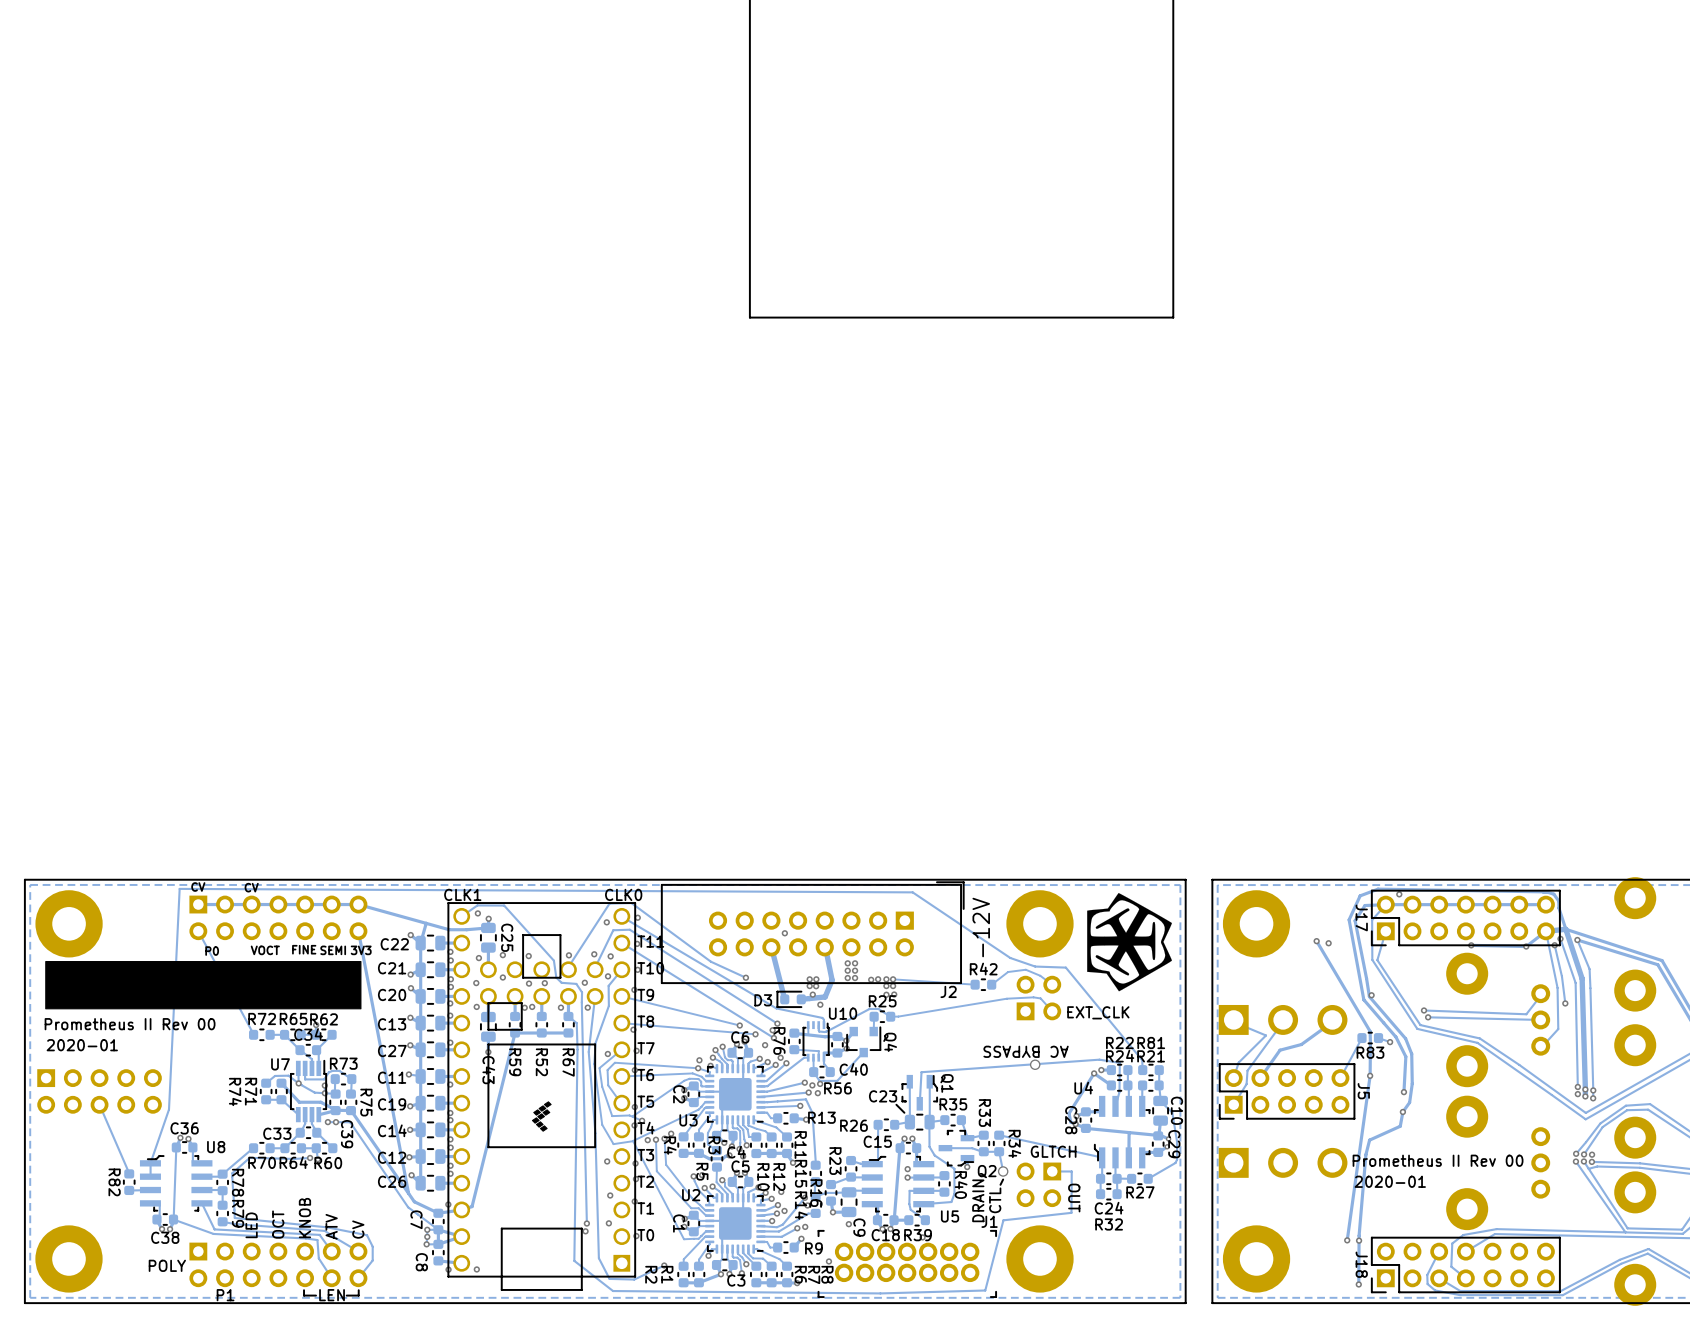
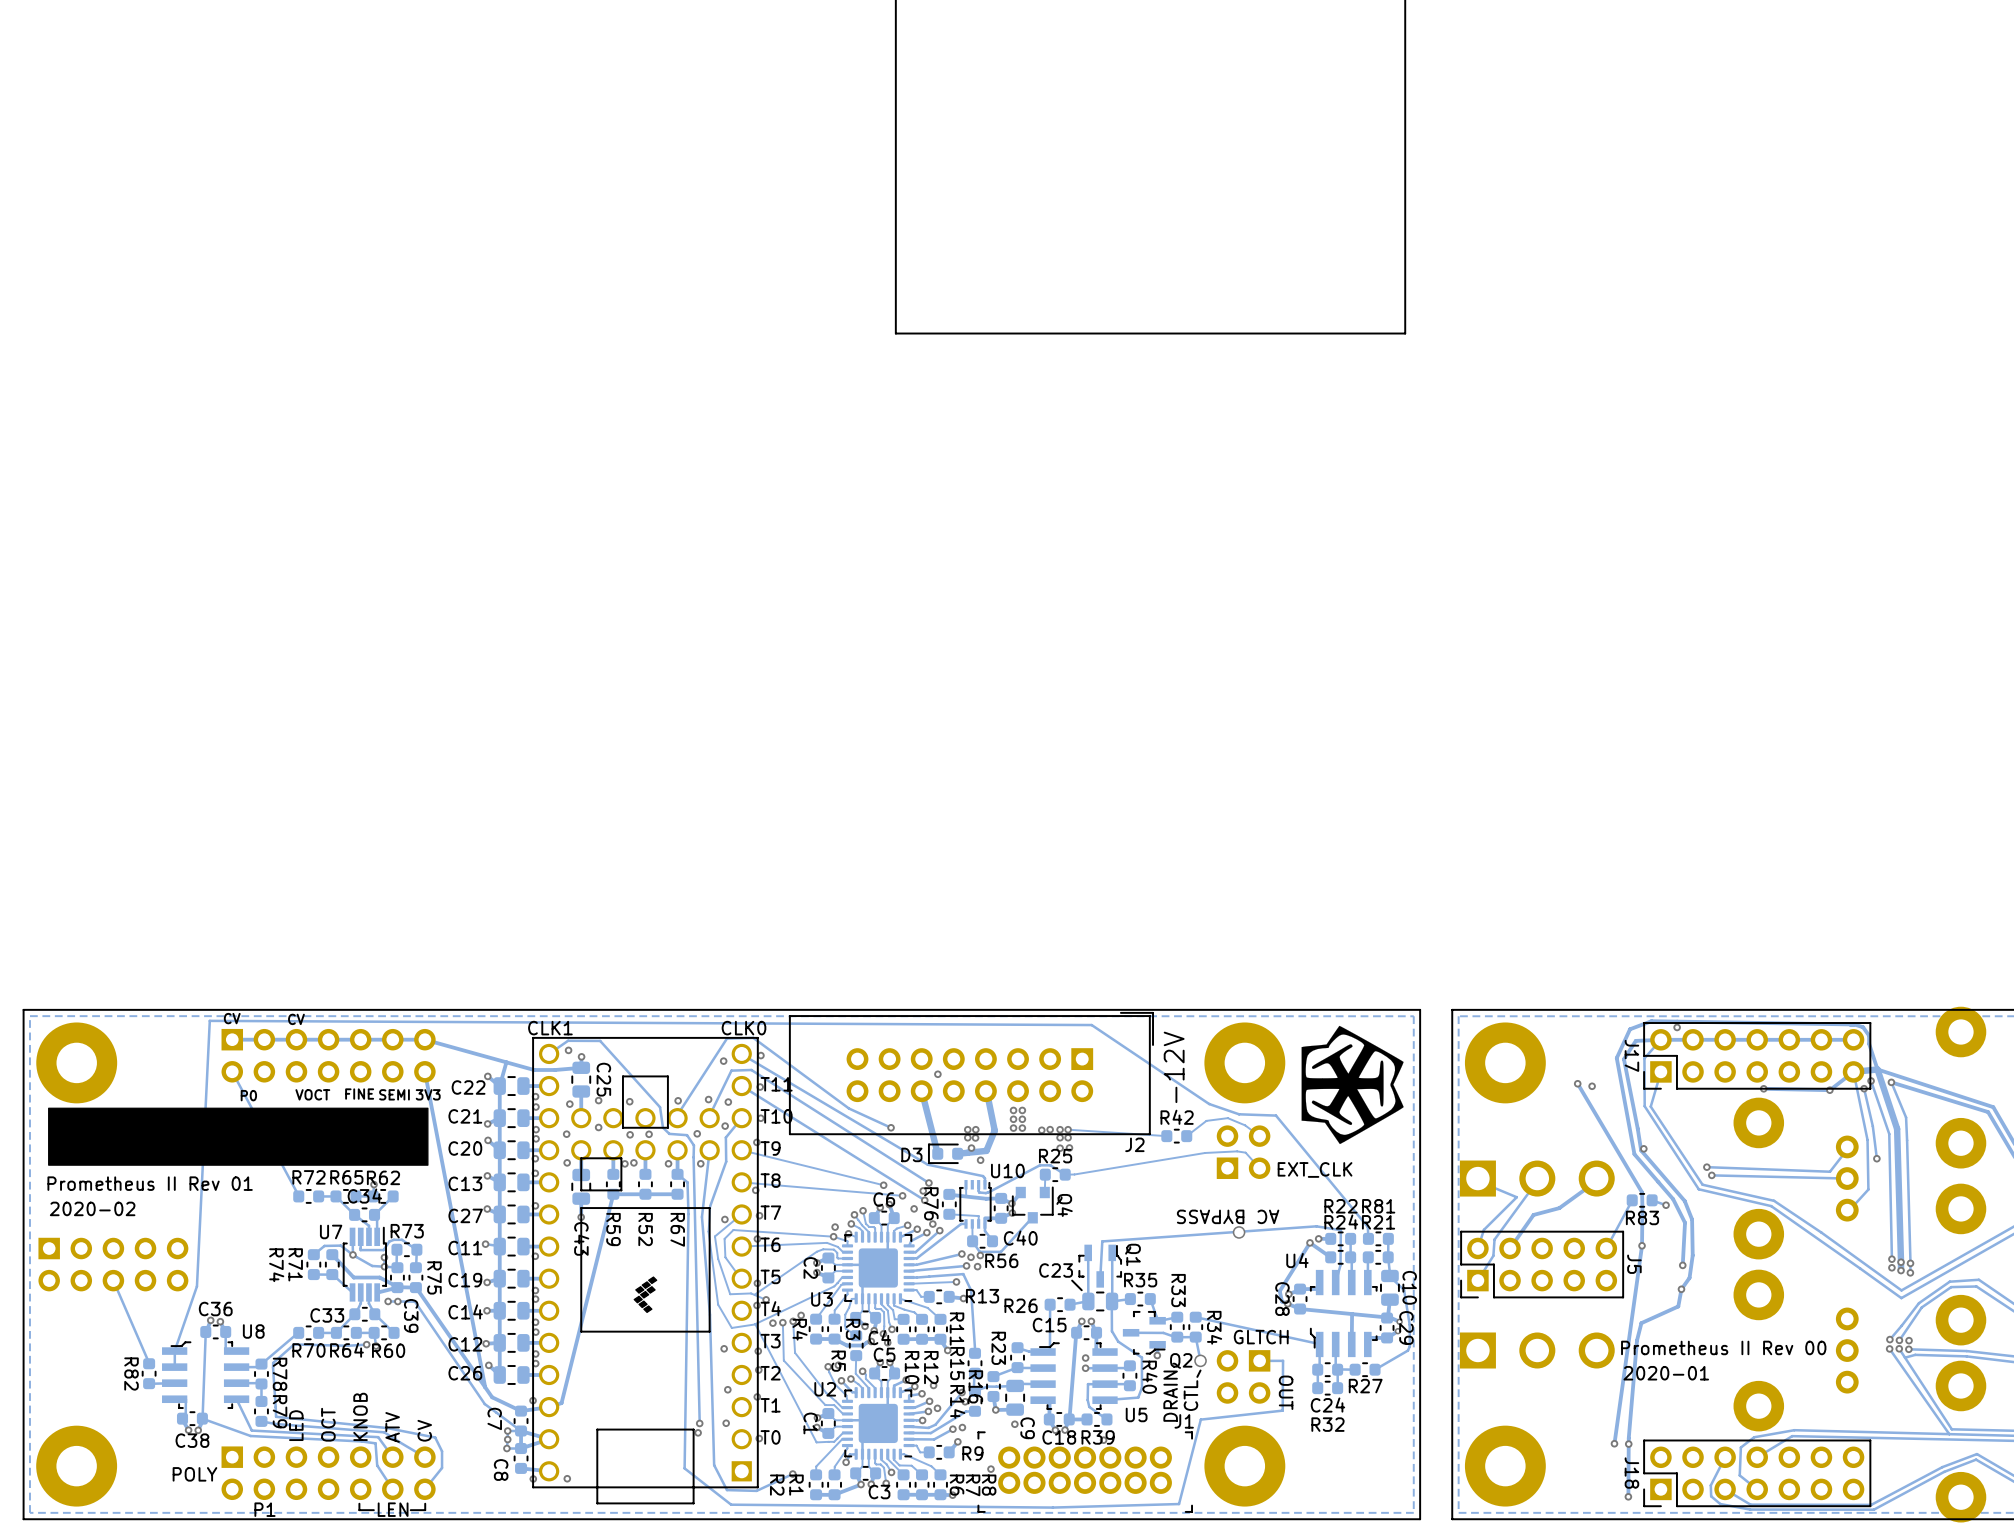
text: Prometheus II Rev 00 (130, 1024) -> Prometheus II Rev 01 (150, 1183)
text: 2020-01 (82, 1045) -> 2020-02 (92, 1208)

